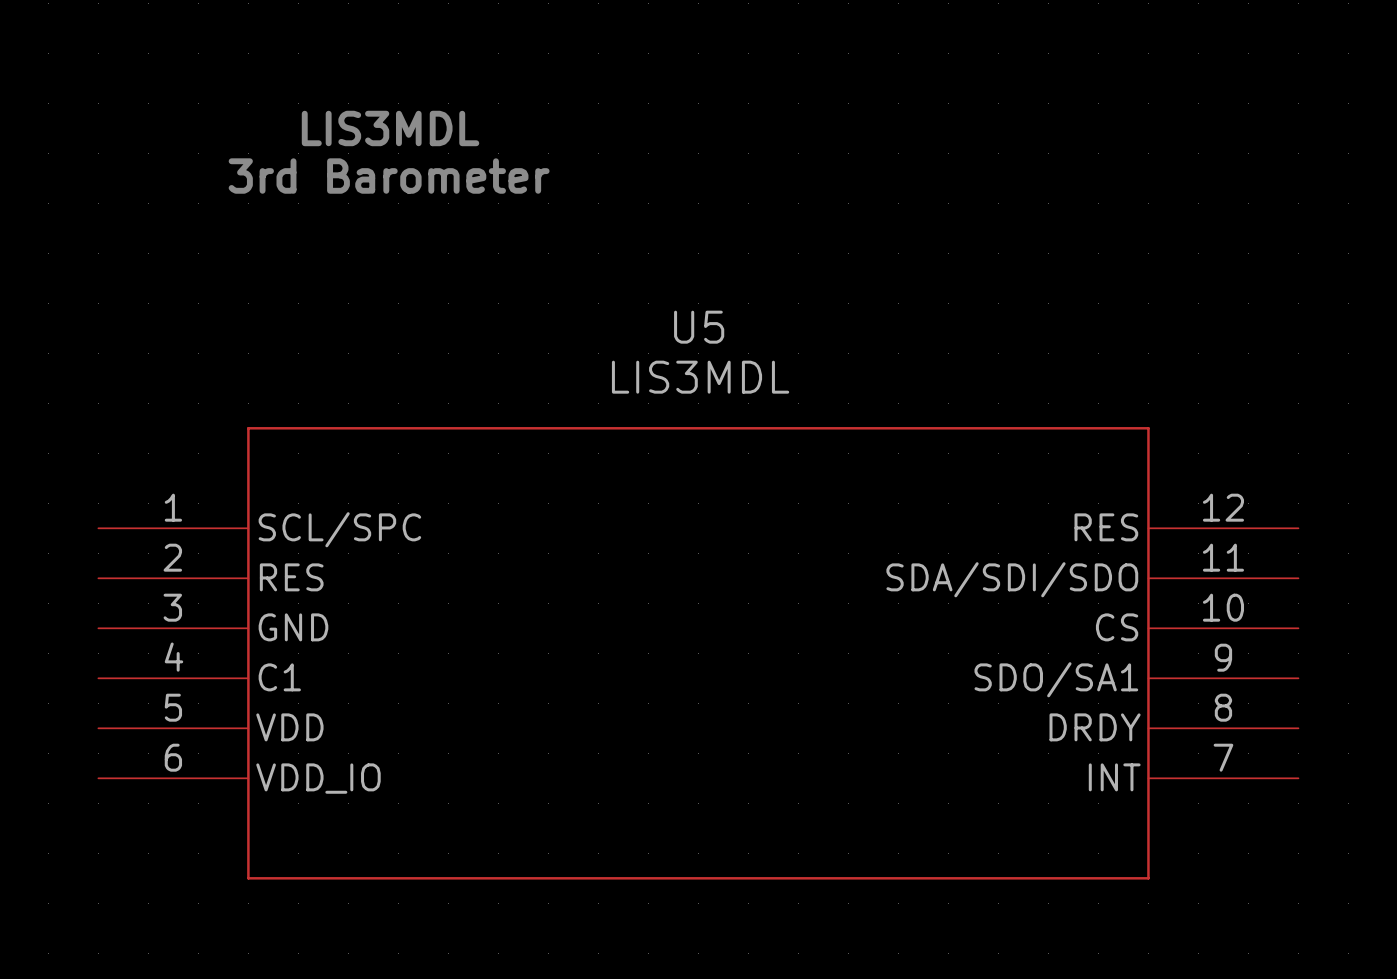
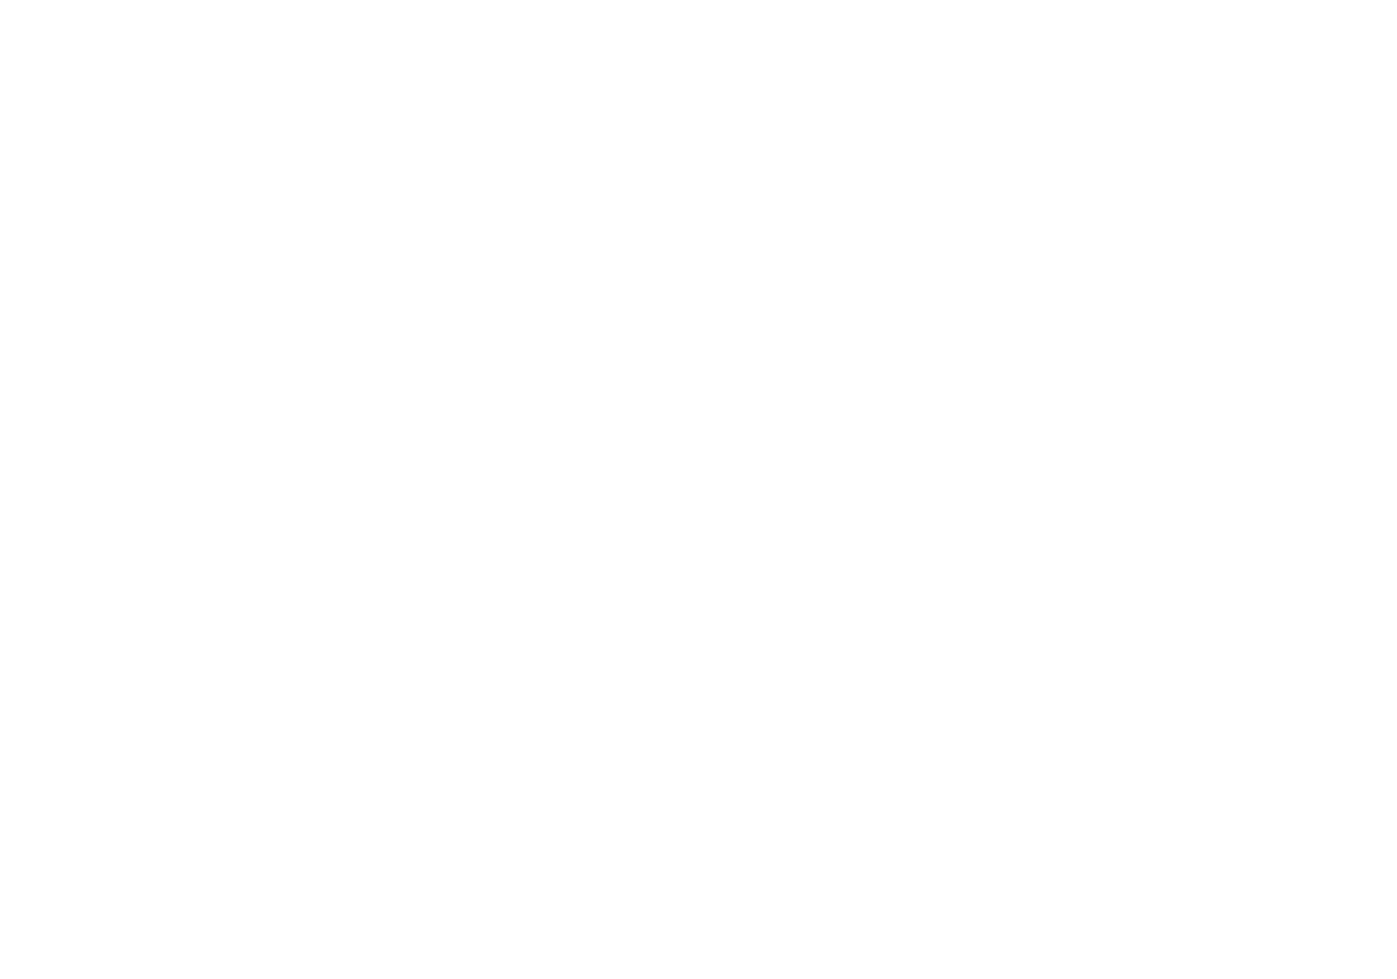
text: LIS3MDL (390, 128) -> none
text: 3rd Barometer (389, 176) -> none
U5: LIS3MDL (698, 653) -> none

